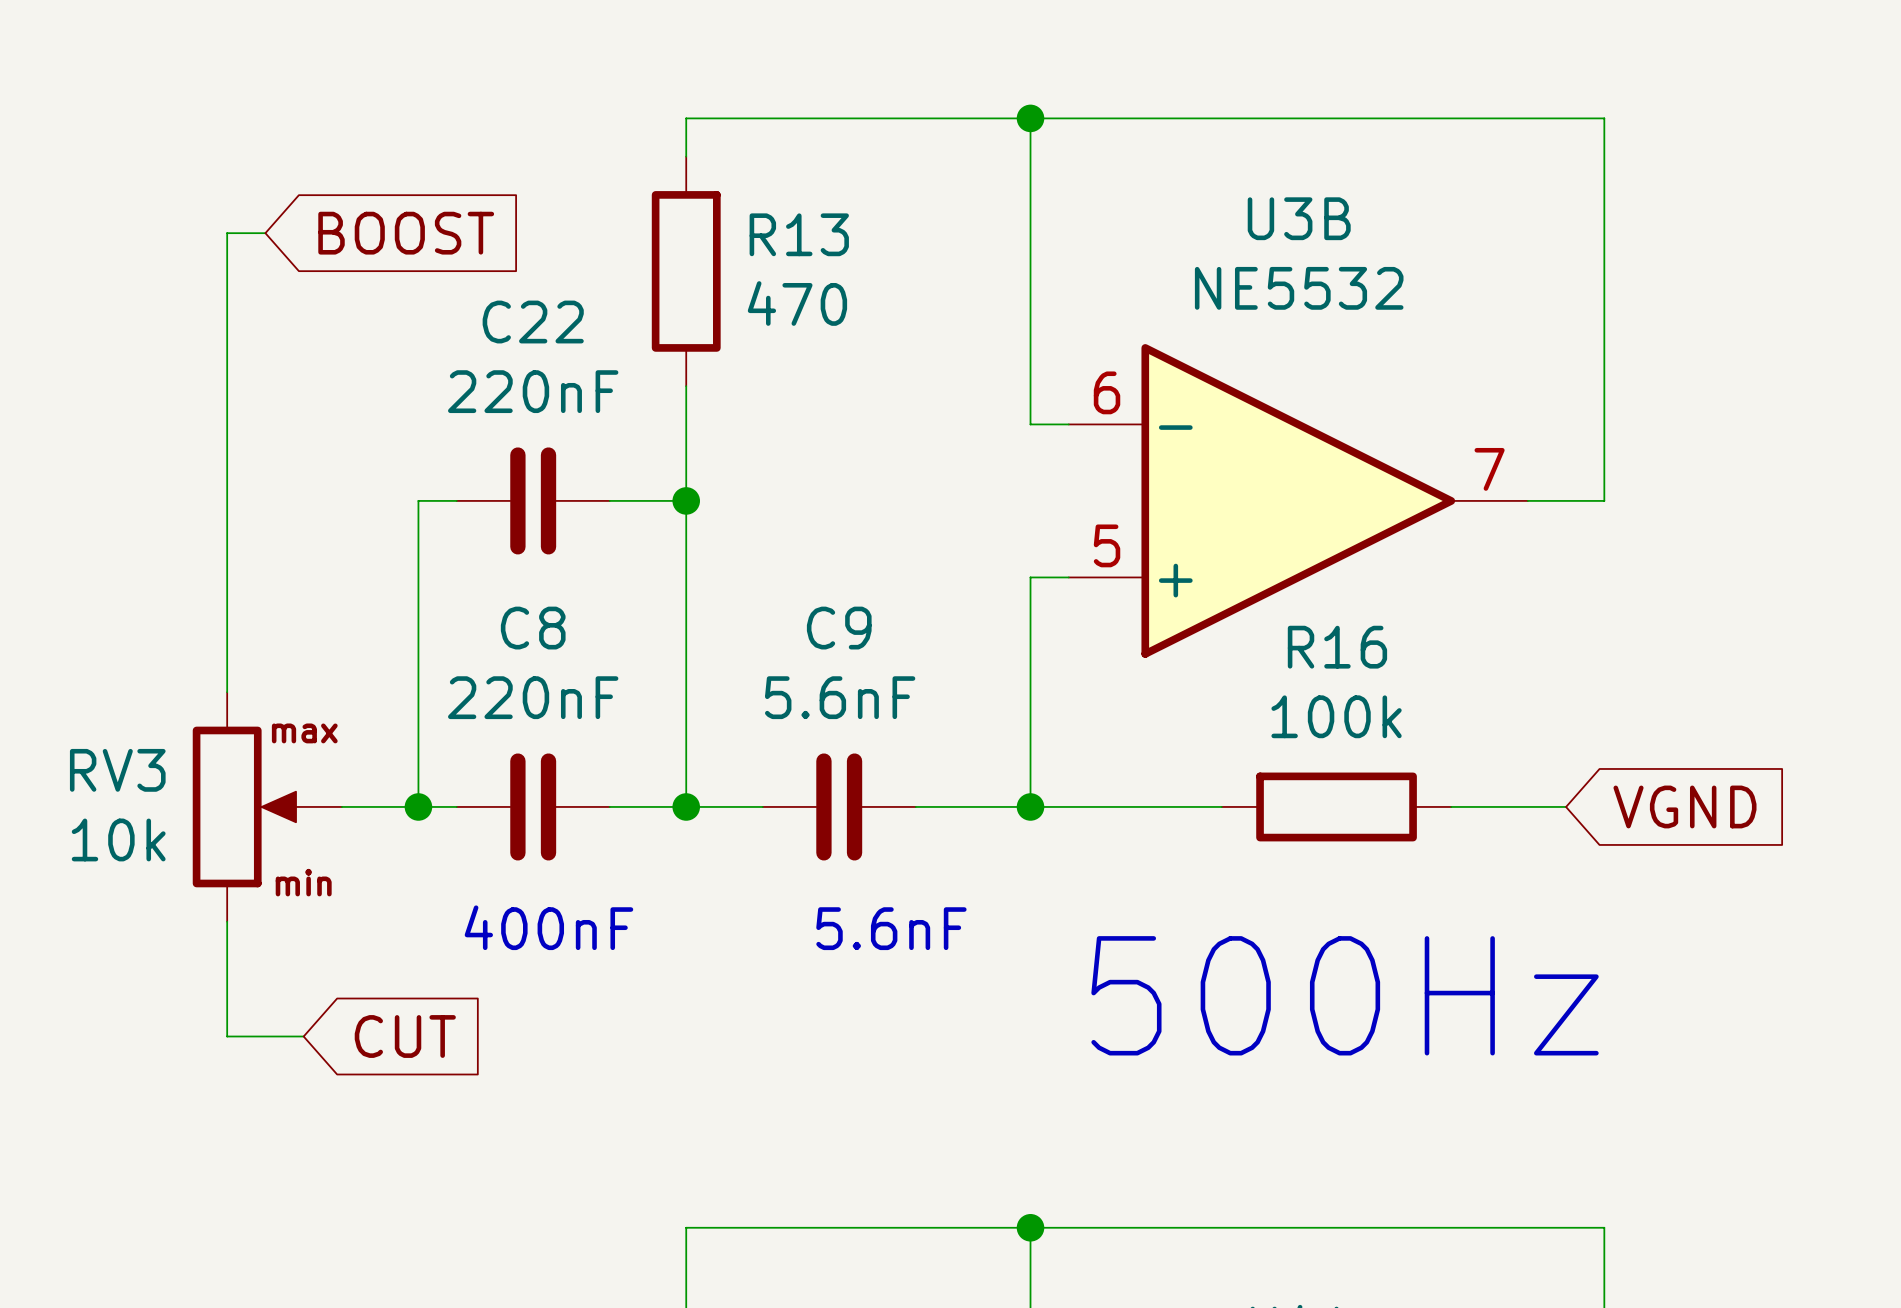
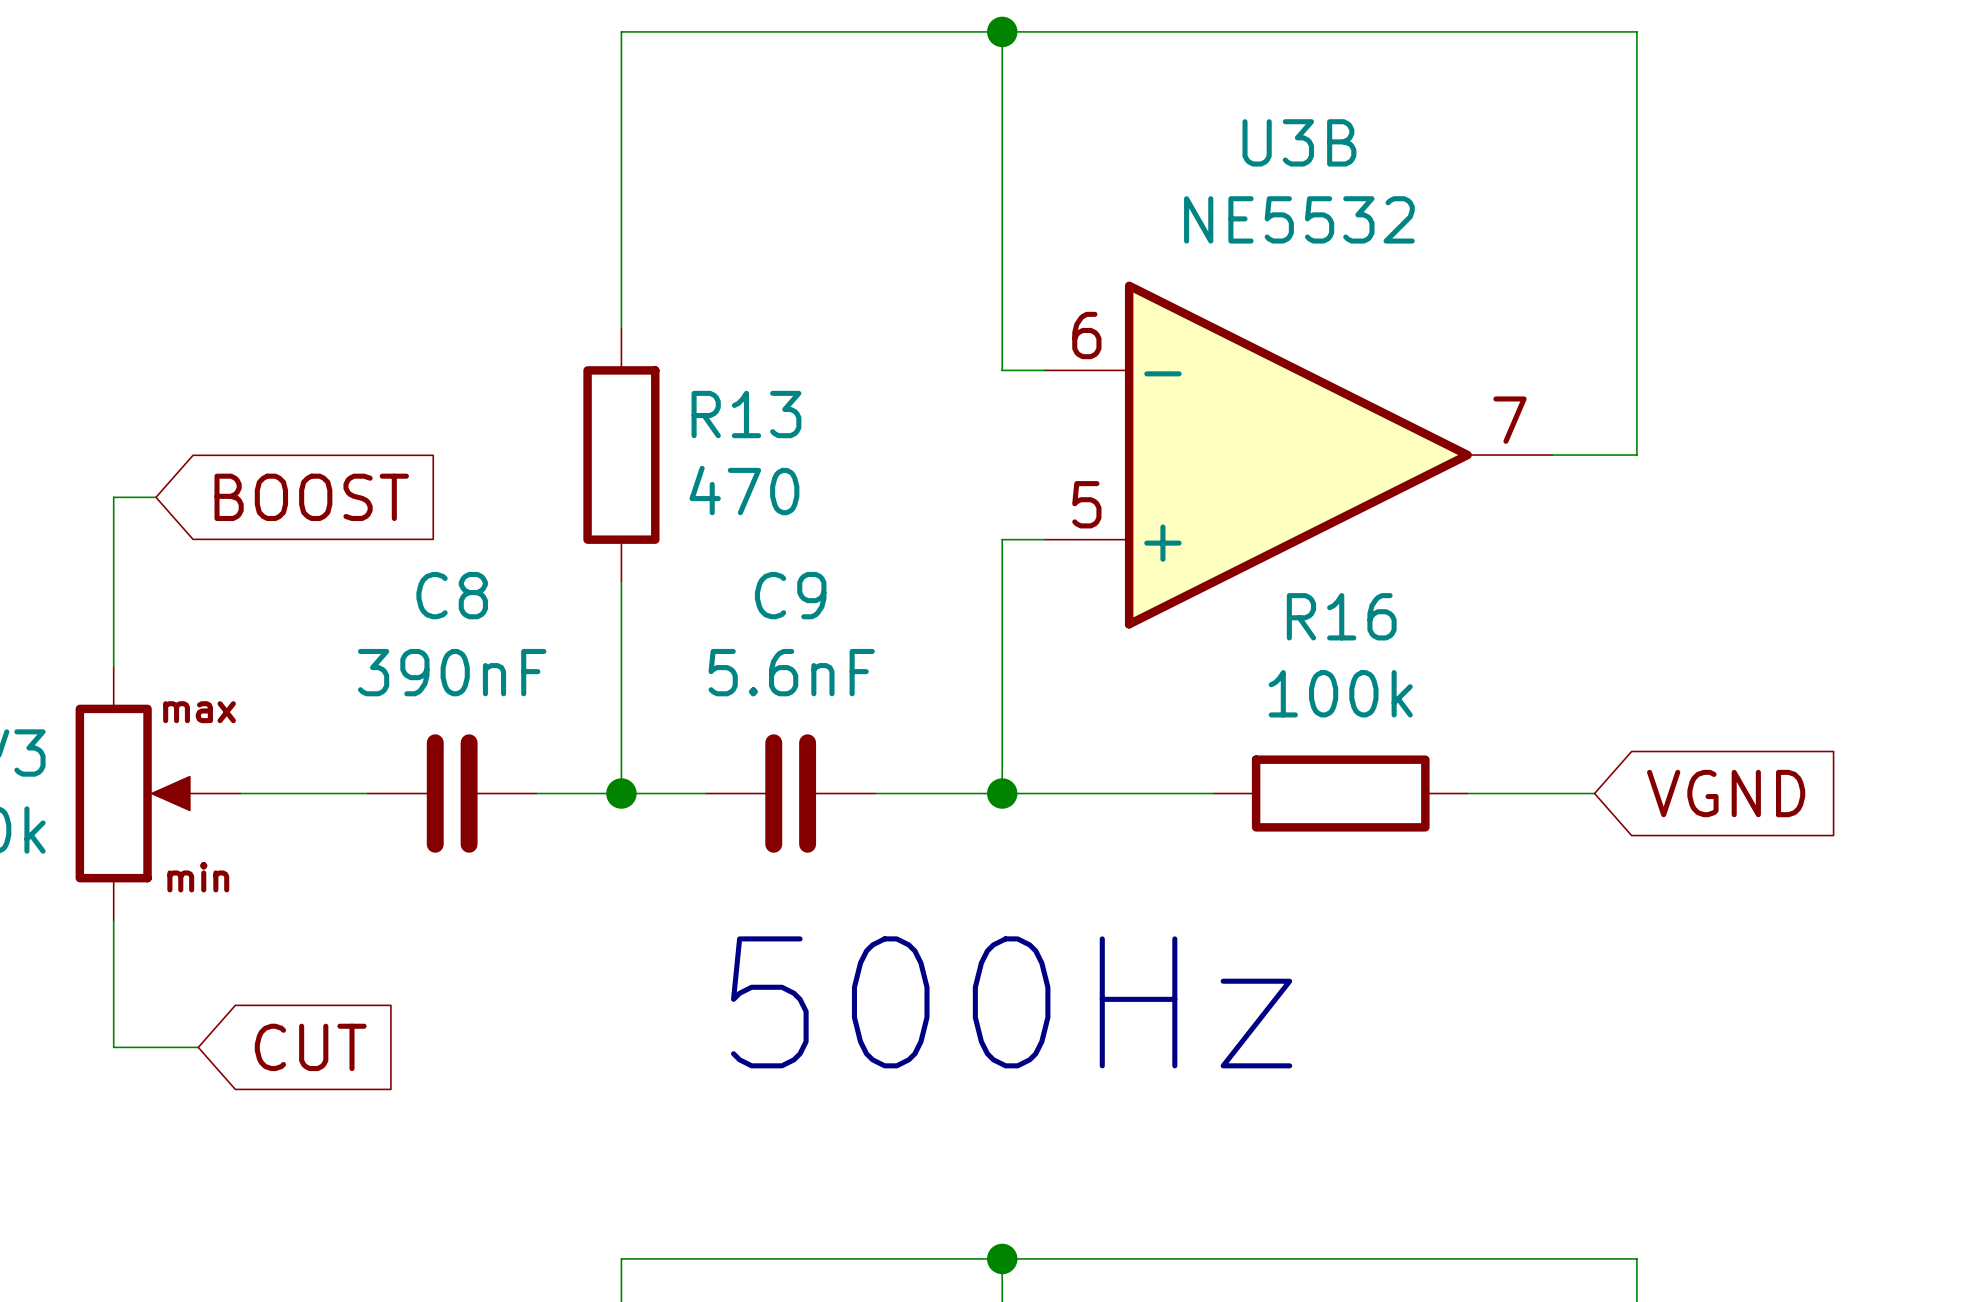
wire: (265, 233) (227, 233) (227, 539) -> (155, 497) (113, 497)
global label position: BOOST (406, 233) -> BOOST (311, 497)
R13 position: (686, 271) -> (621, 455)
wire: (686, 386) (686, 615) -> (621, 328) (621, 74)
wire: (456, 500) (418, 500) (418, 806) -> none
C22: 220nF (533, 500) -> none
wire: (609, 500) (686, 500) -> none
junction: (686, 500) -> none
C8 value: 220nF (533, 697) -> 390nF (452, 672)
junction: (418, 806) -> none
text: 400nF 5.6nF (715, 927) -> none
text position: 500Hz (1345, 995) -> 500Hz (1011, 1002)

